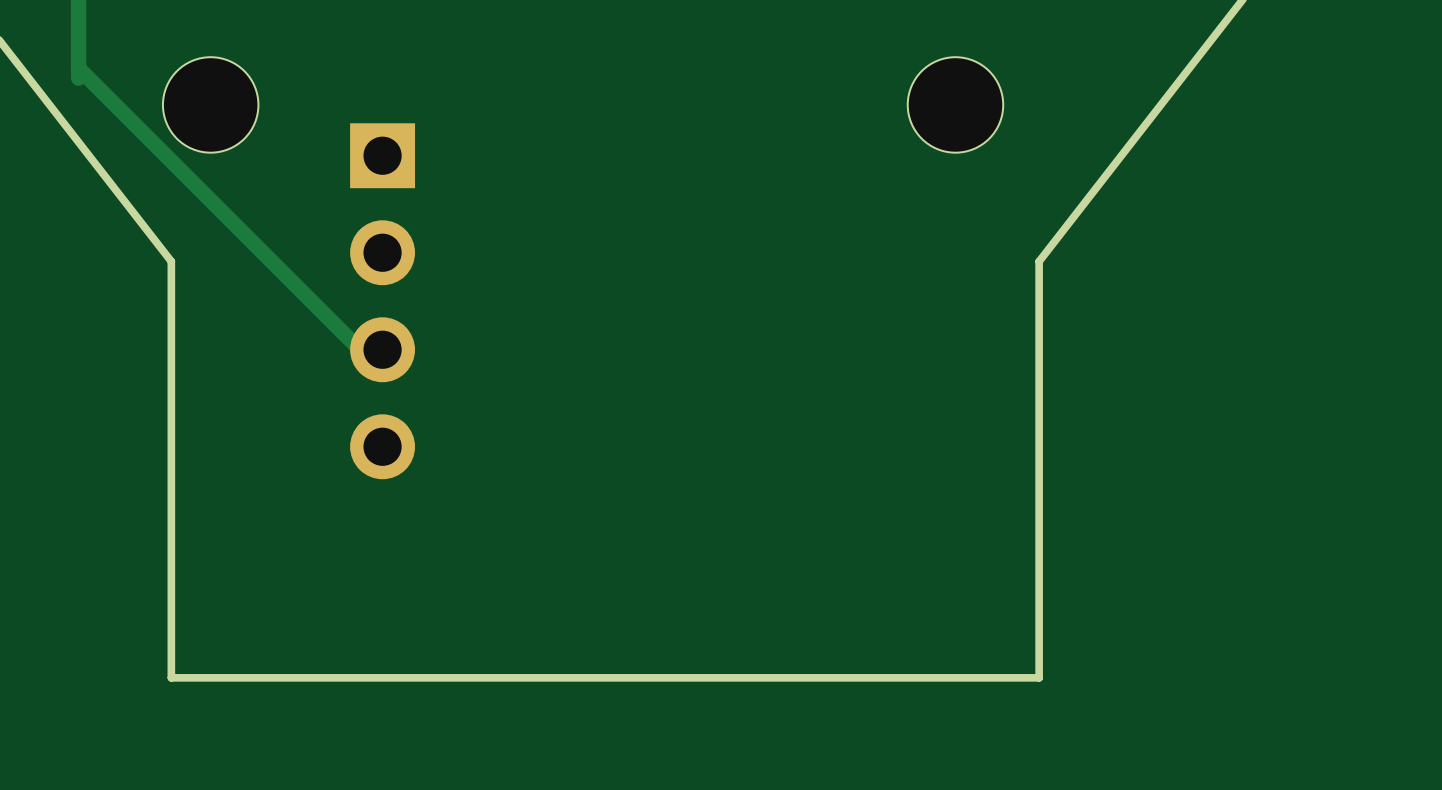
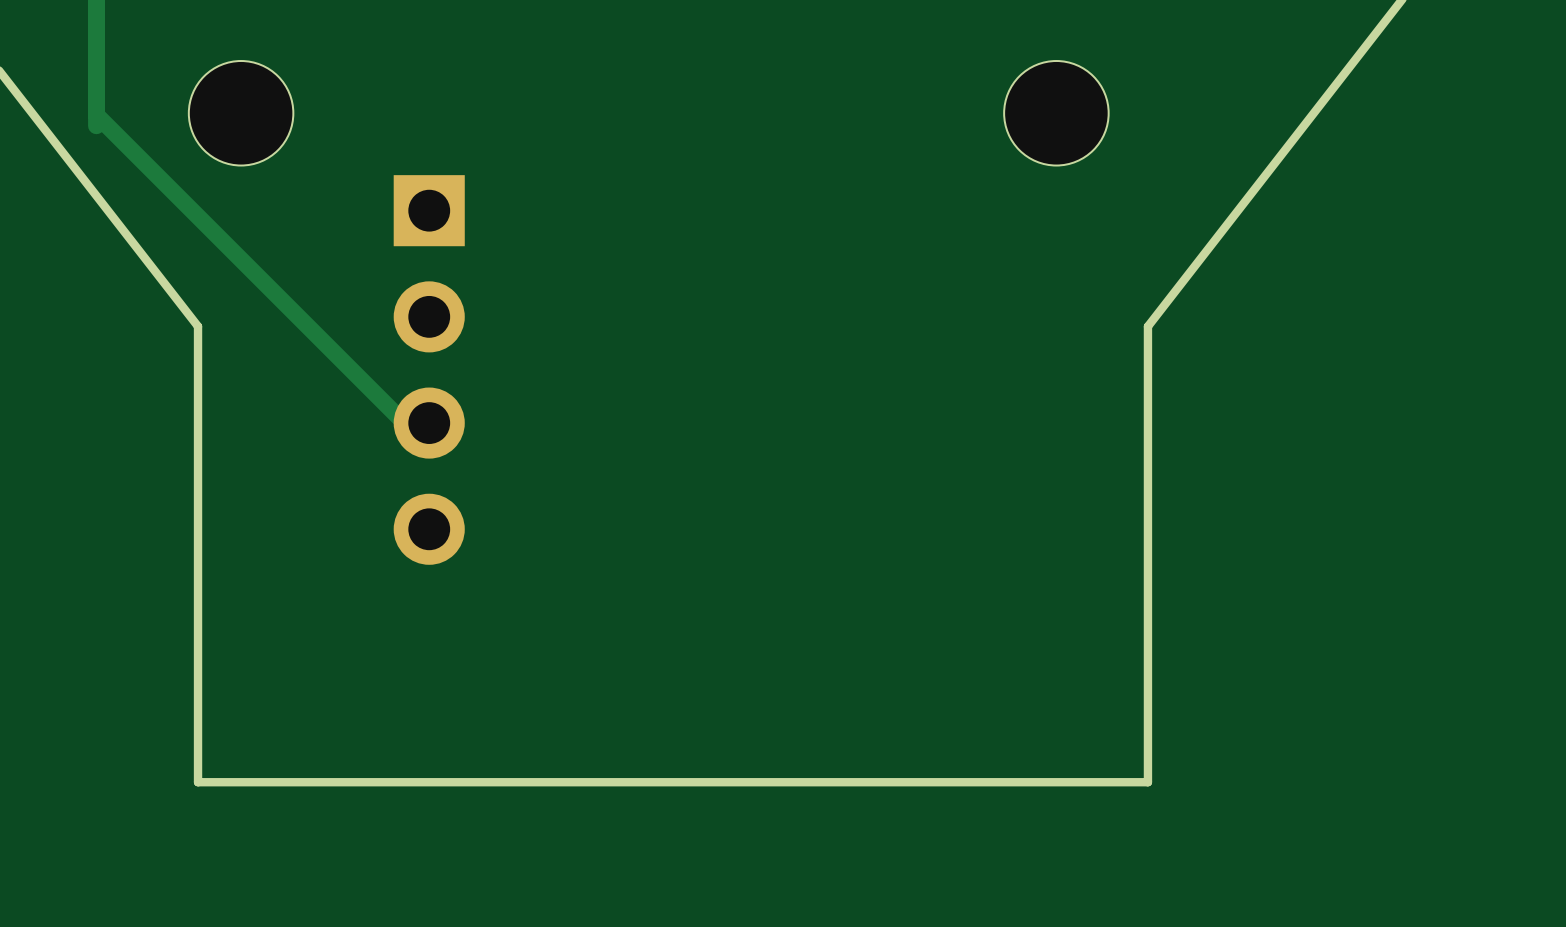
part position: (210, 104) -> (241, 113)
part position: (955, 104) -> (1056, 113)

